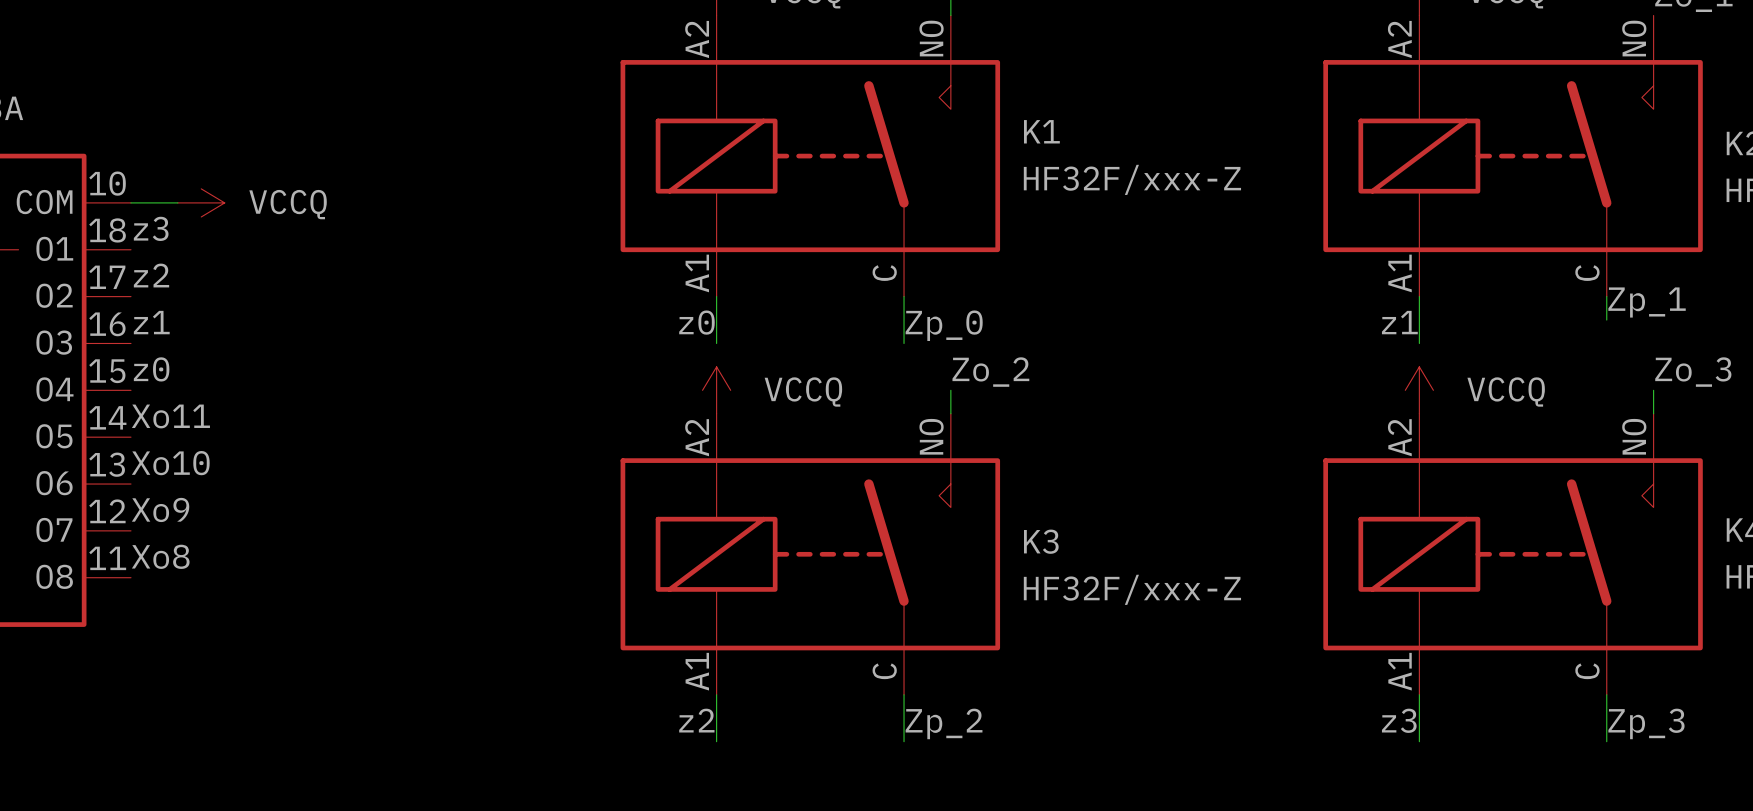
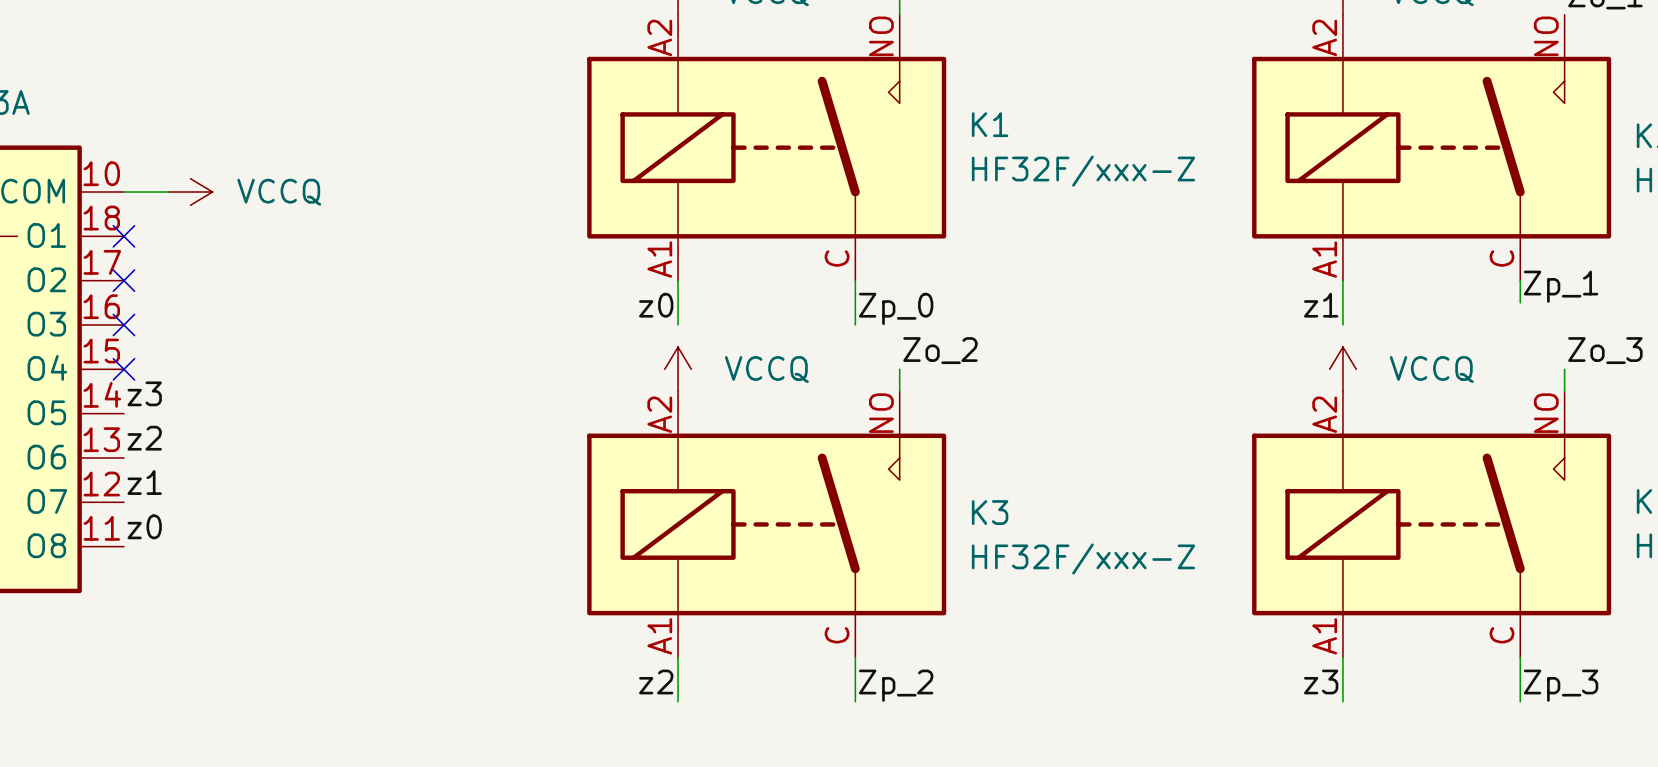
label: z3 (151, 228) -> none
no-connect mark: none -> (123, 236)
label: z2 (151, 275) -> none
no-connect mark: none -> (123, 280)
label: z1 (151, 322) -> none
no-connect mark: none -> (123, 324)
label: z0 (151, 369) -> none
no-connect mark: none -> (123, 369)
label: Xo11 (170, 416) -> z3 (144, 393)
label: Xo10 (170, 463) -> z2 (144, 438)
label: Xo9 (160, 509) -> z1 (144, 482)
label: Xo8 (160, 556) -> z0 (144, 526)

